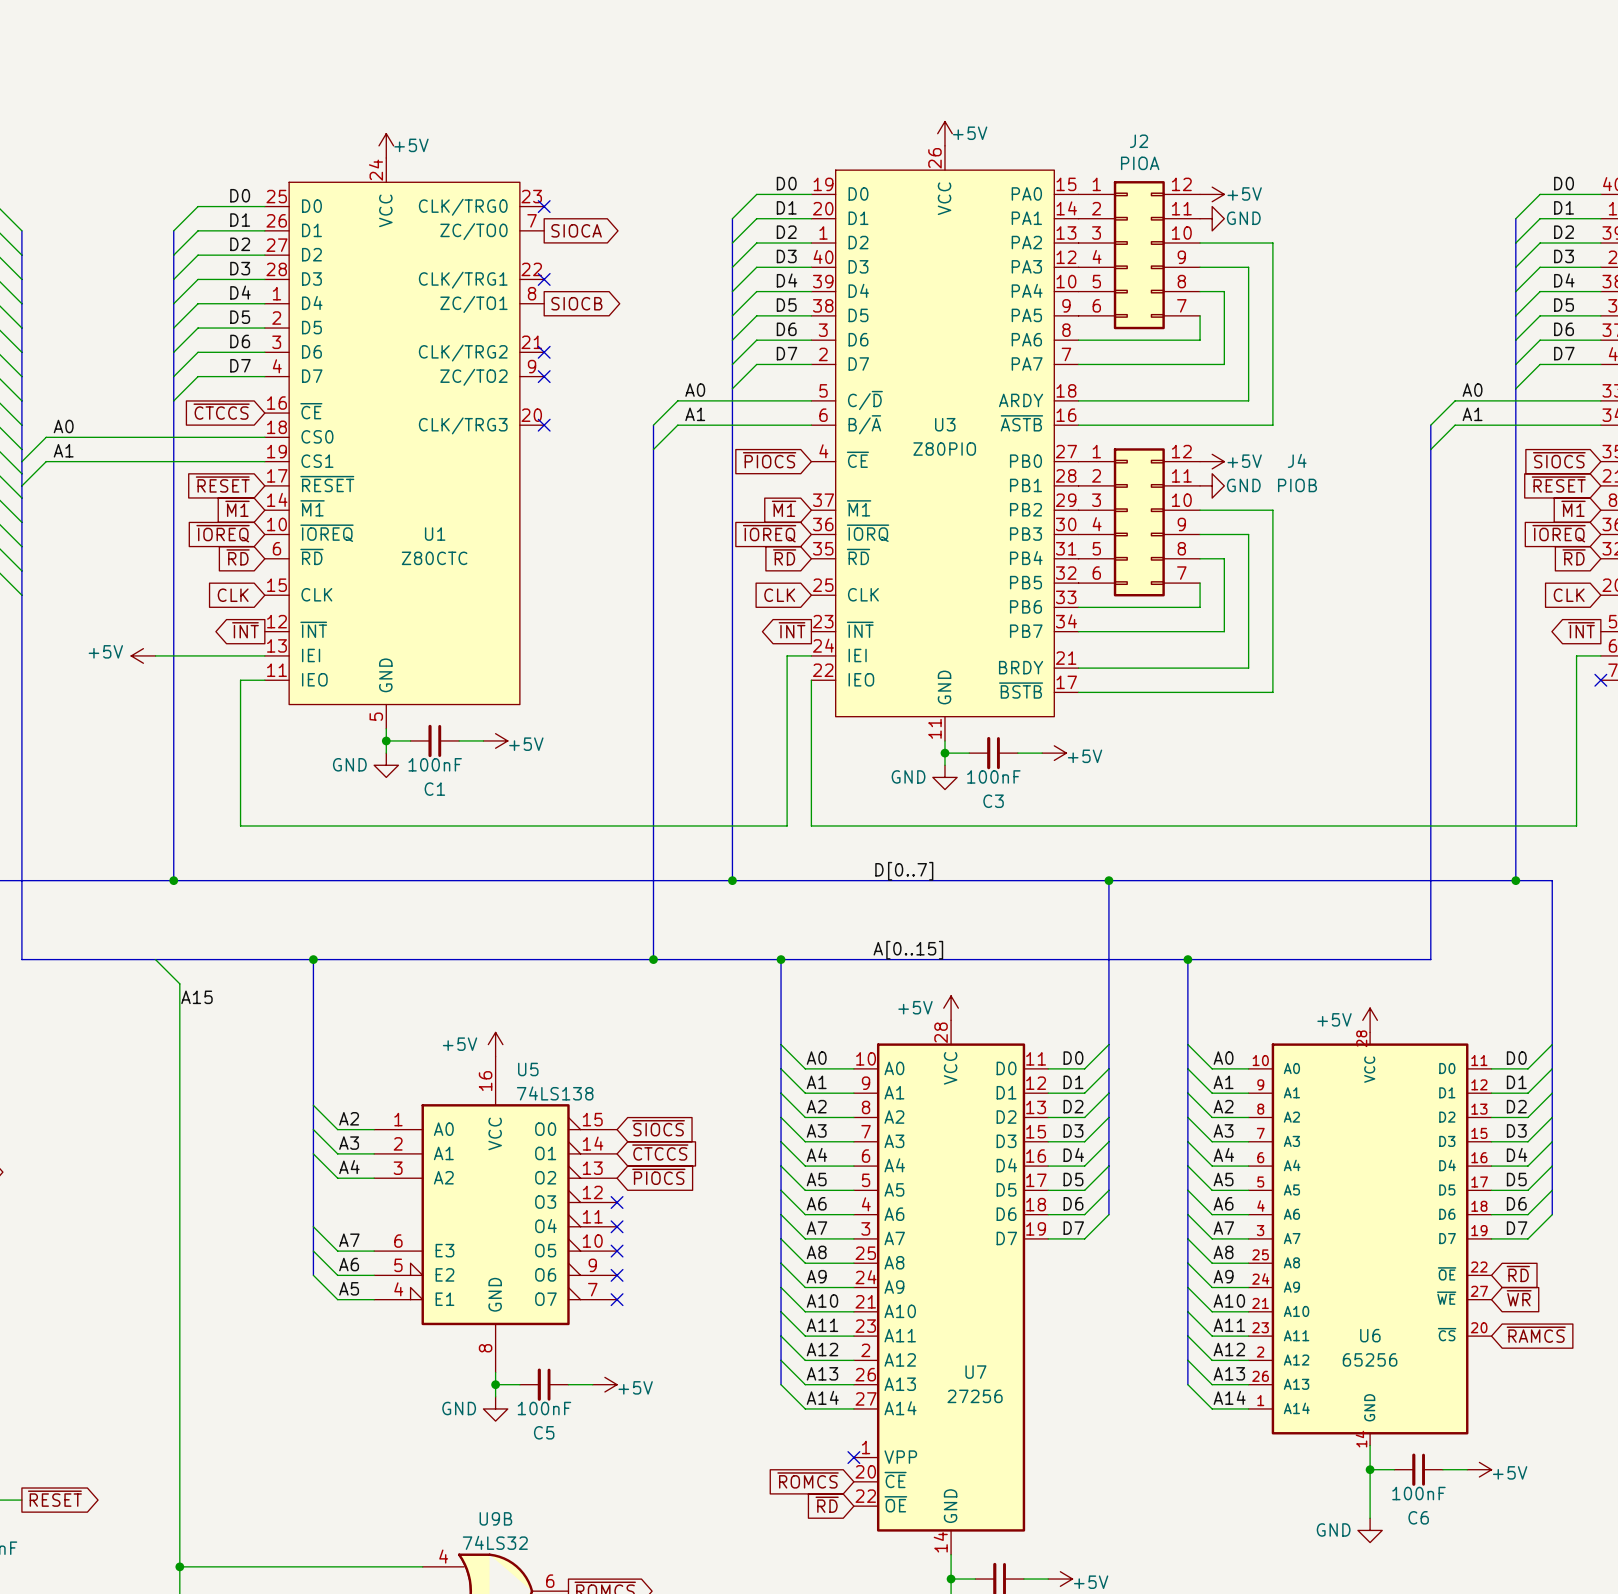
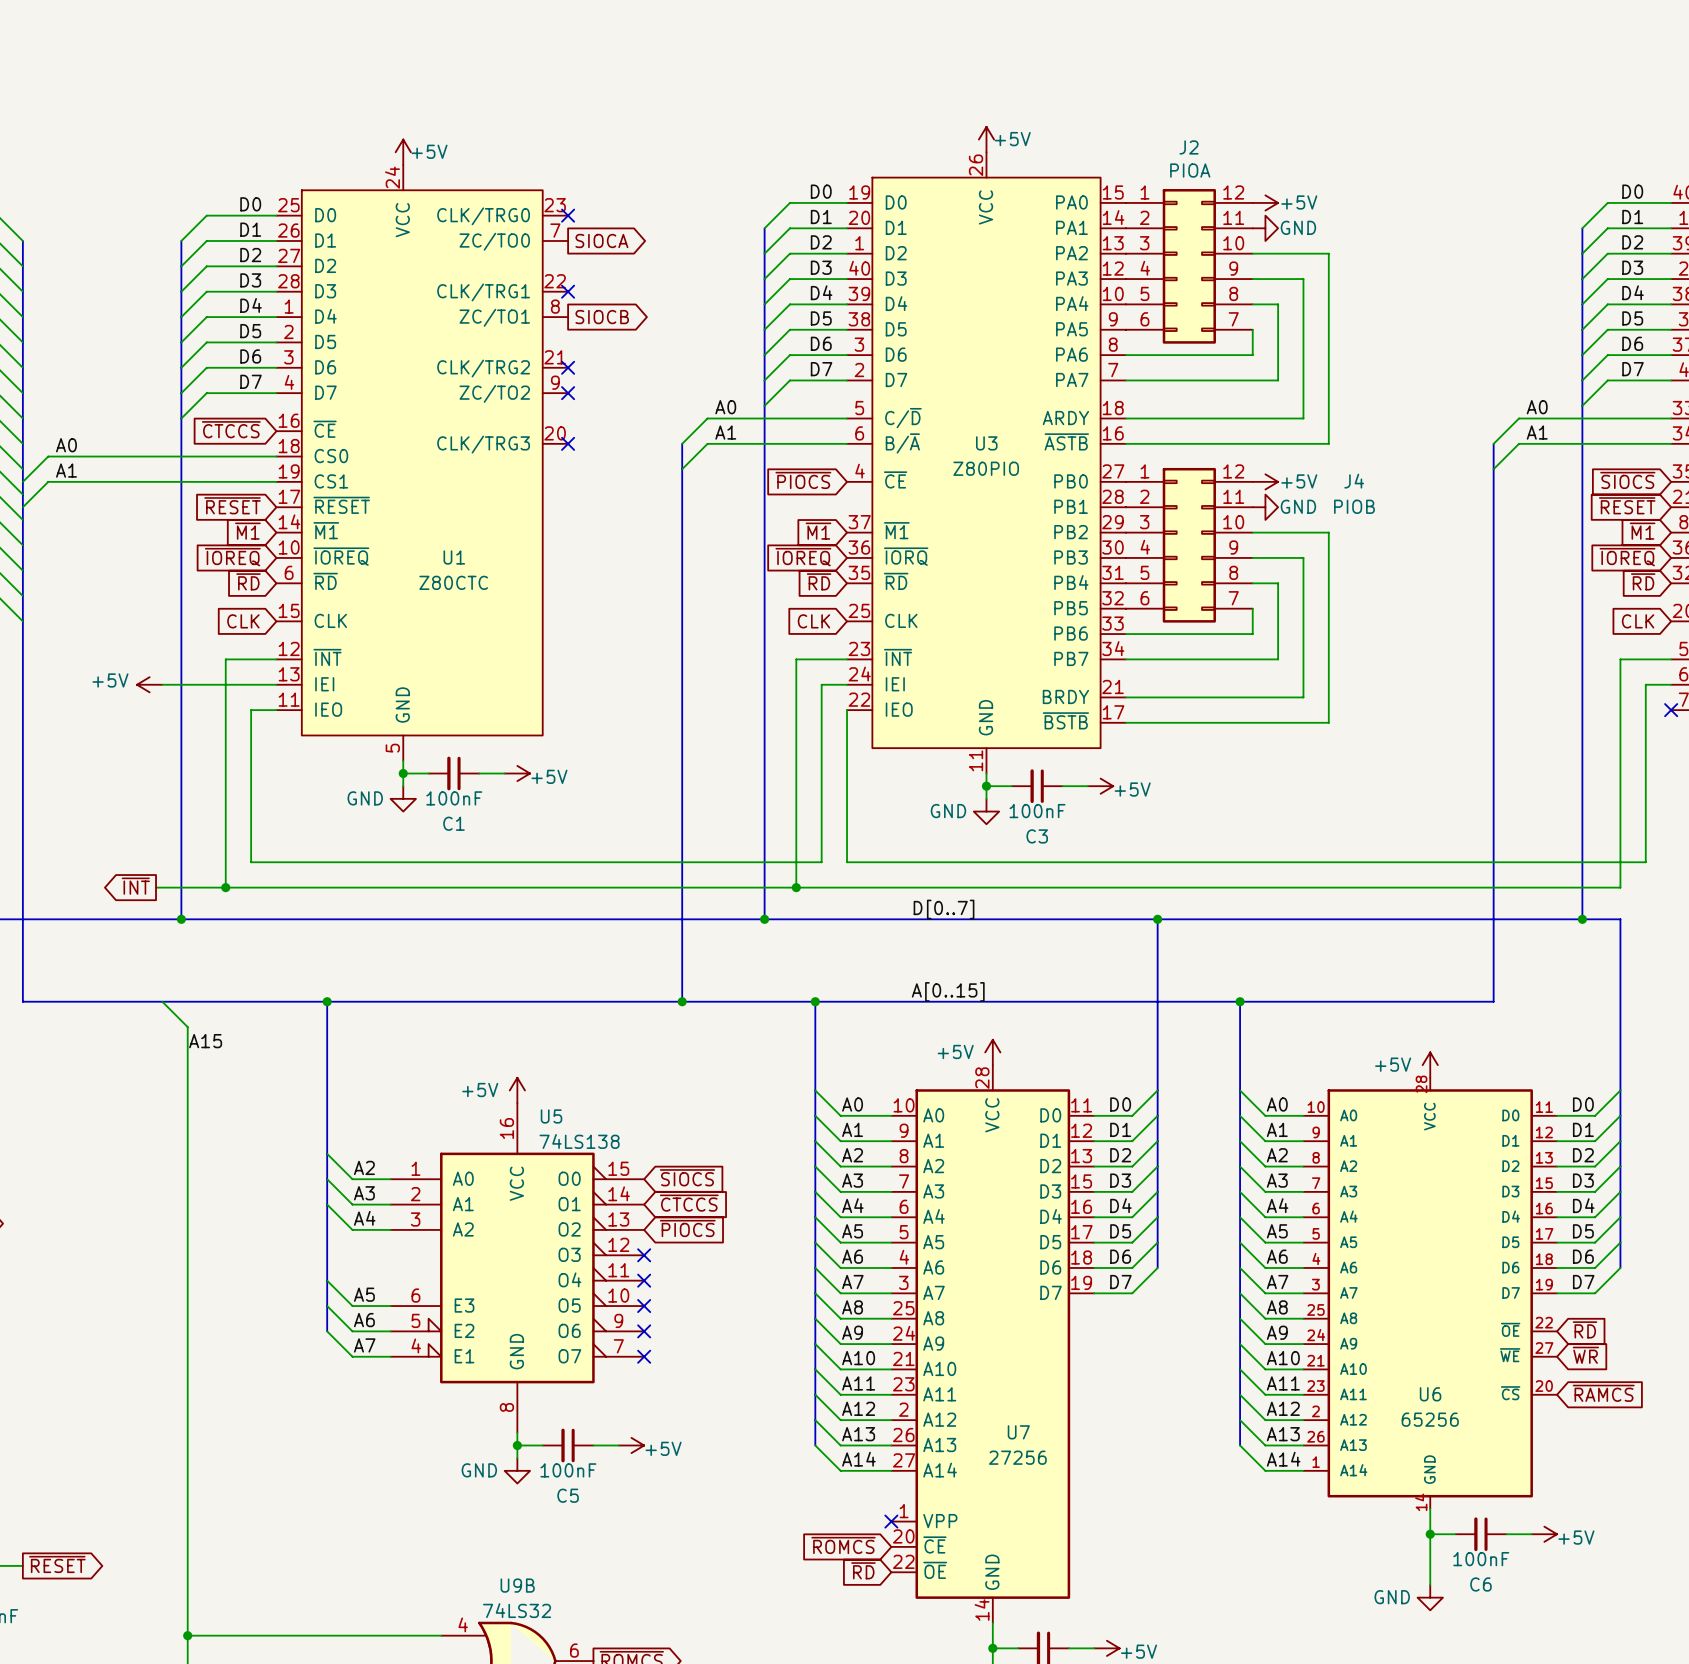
global label: ~{INT} (245, 630) -> none
global label: ~{INT} (792, 630) -> none
global label: ~{INT} (1581, 630) -> none
wire: none -> (276, 659) (225, 659) (225, 887)
wire: none -> (847, 659) (796, 659) (796, 887)
wire: none -> (1671, 659) (1620, 659) (1620, 887) (156, 887)
global label: none -> ~{INT} (135, 886)
junction: none -> (225, 887)
junction: none -> (796, 887)
label: A7 (349, 1240) -> A5 (364, 1294)
label: A5 (349, 1288) -> A7 (364, 1345)

